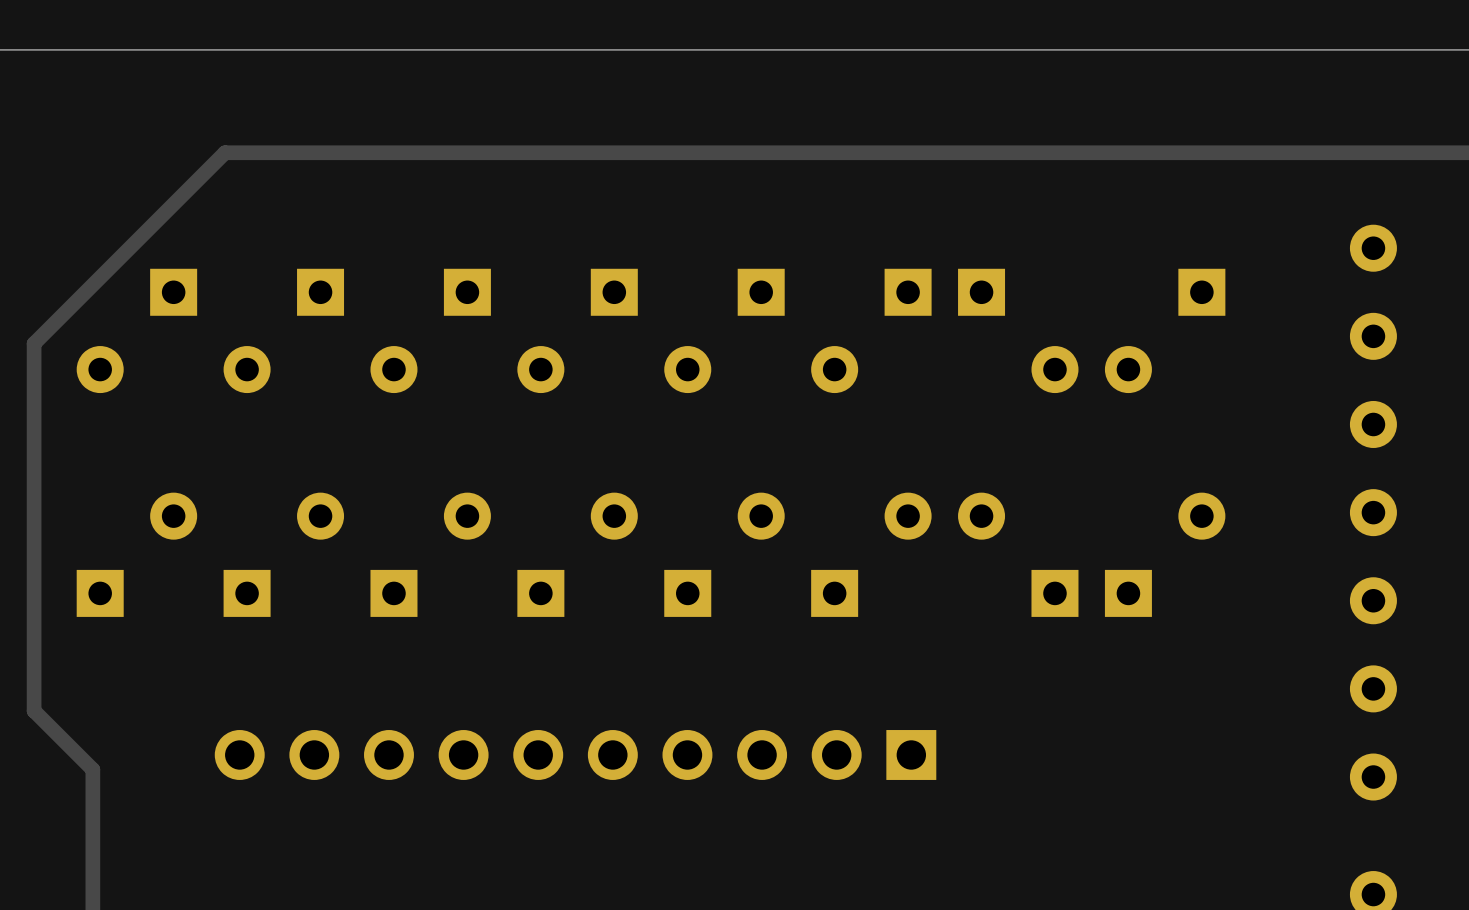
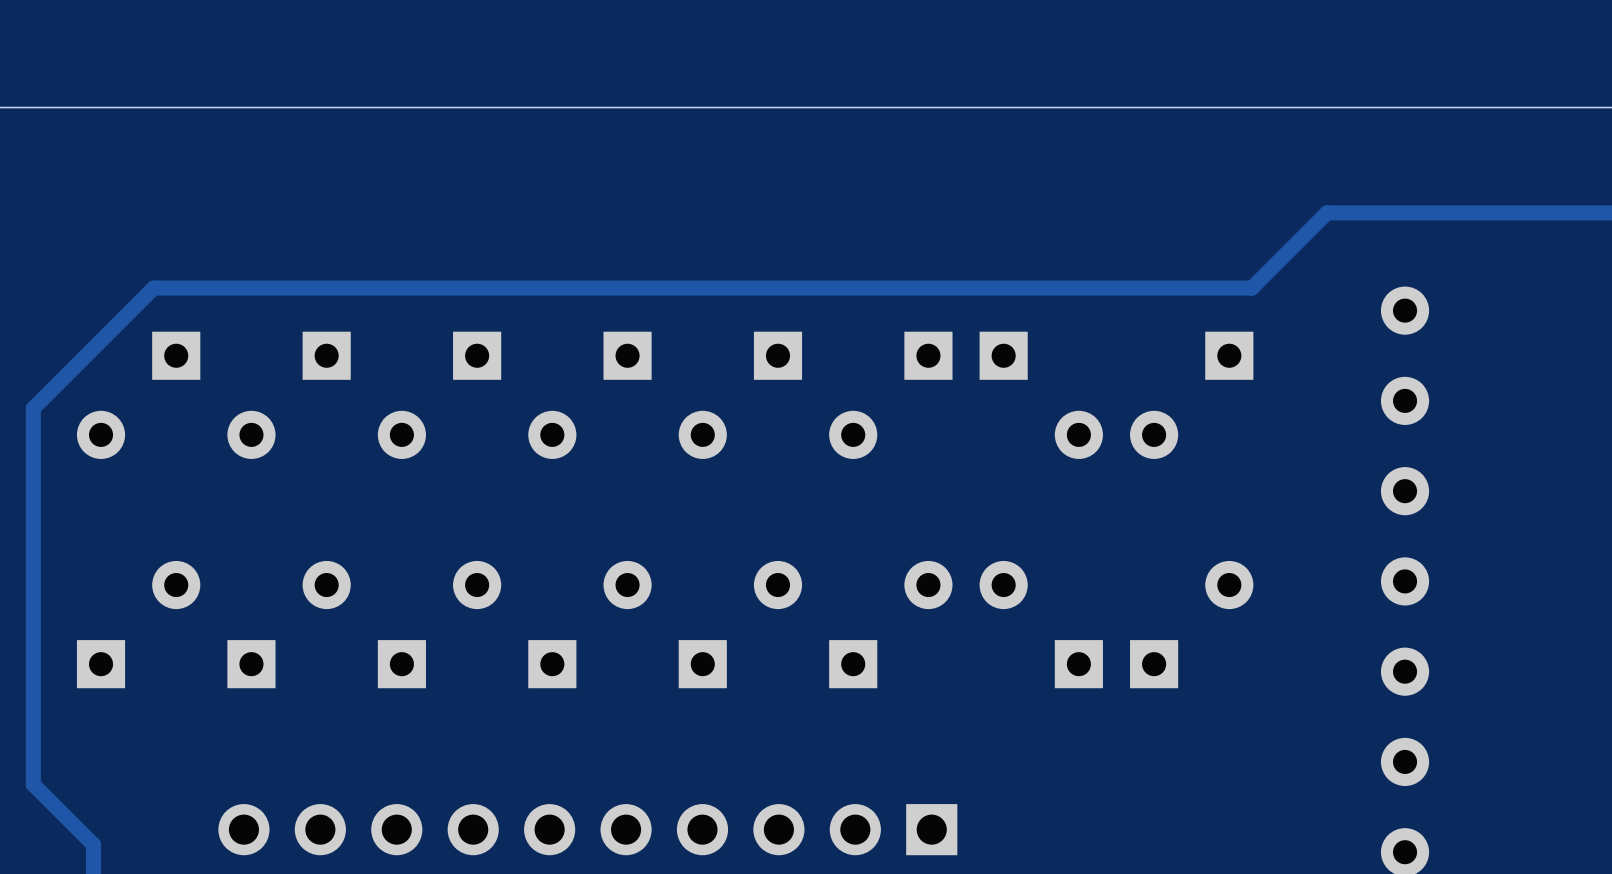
track: (1297, 152) (225, 152) (151, 226) -> (1327, 212) (1251, 288) (153, 288)

